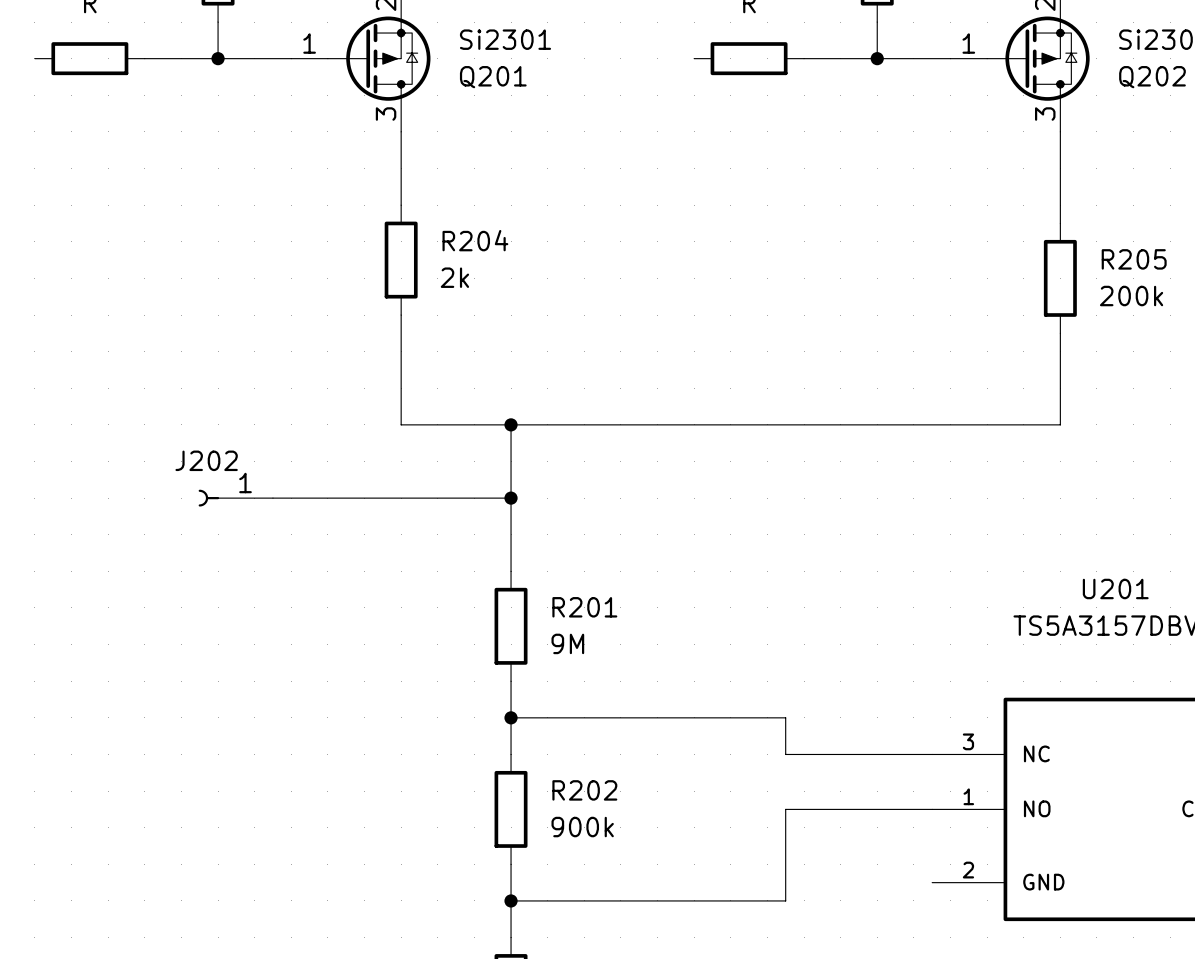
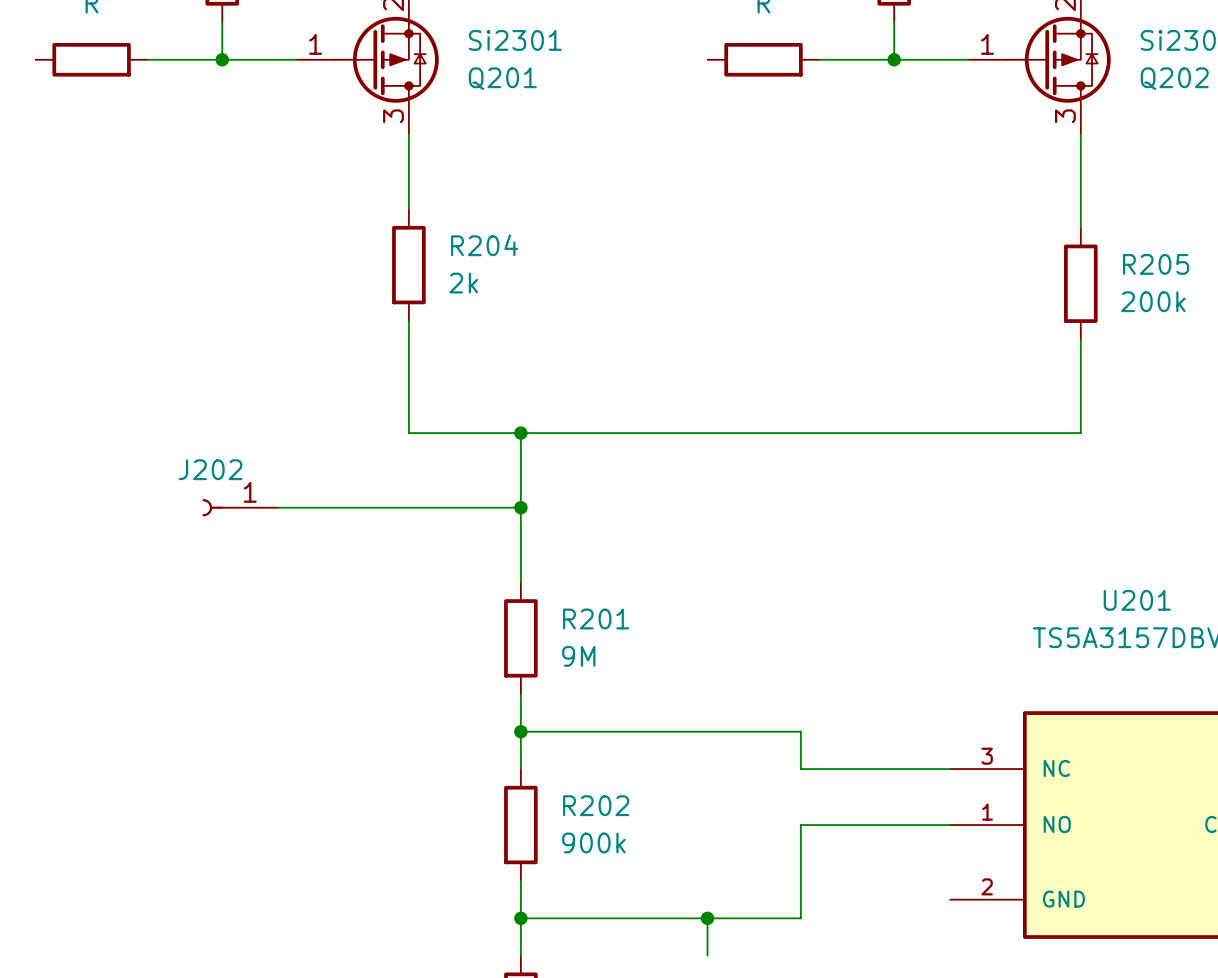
wire: none -> (707, 918) (707, 955)
junction: none -> (707, 918)

